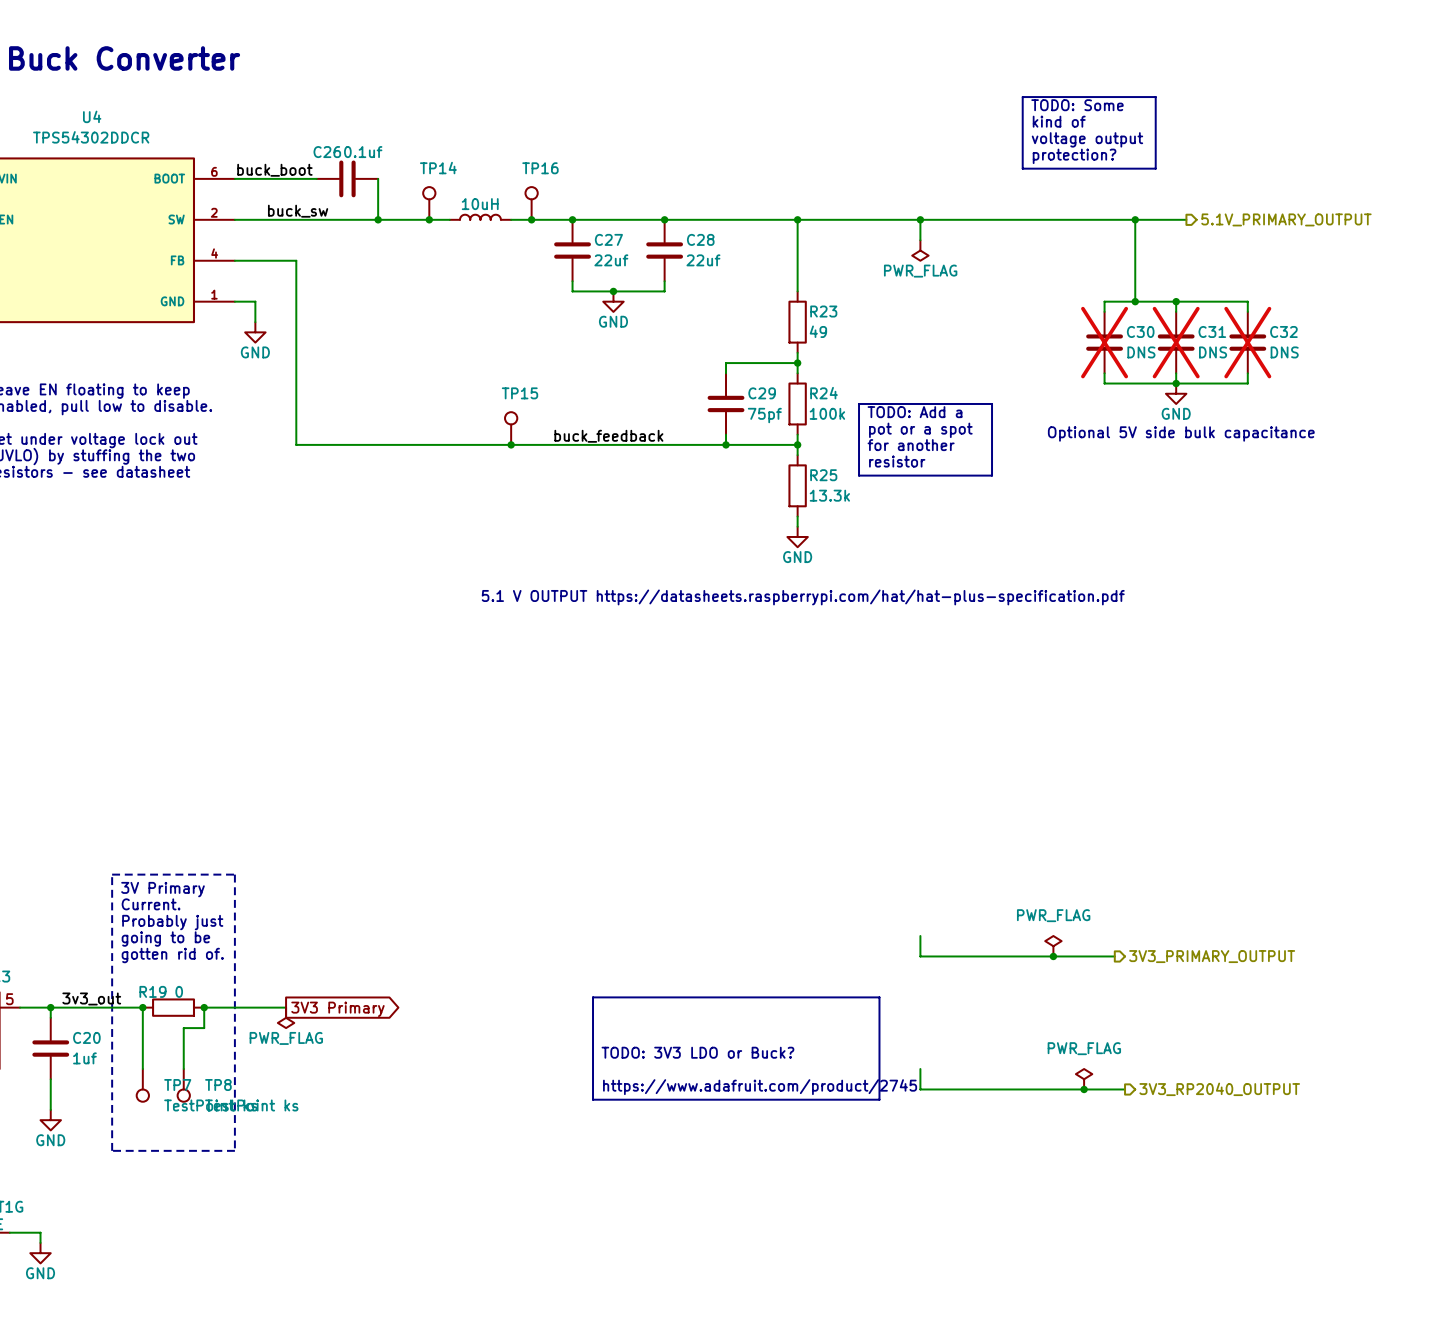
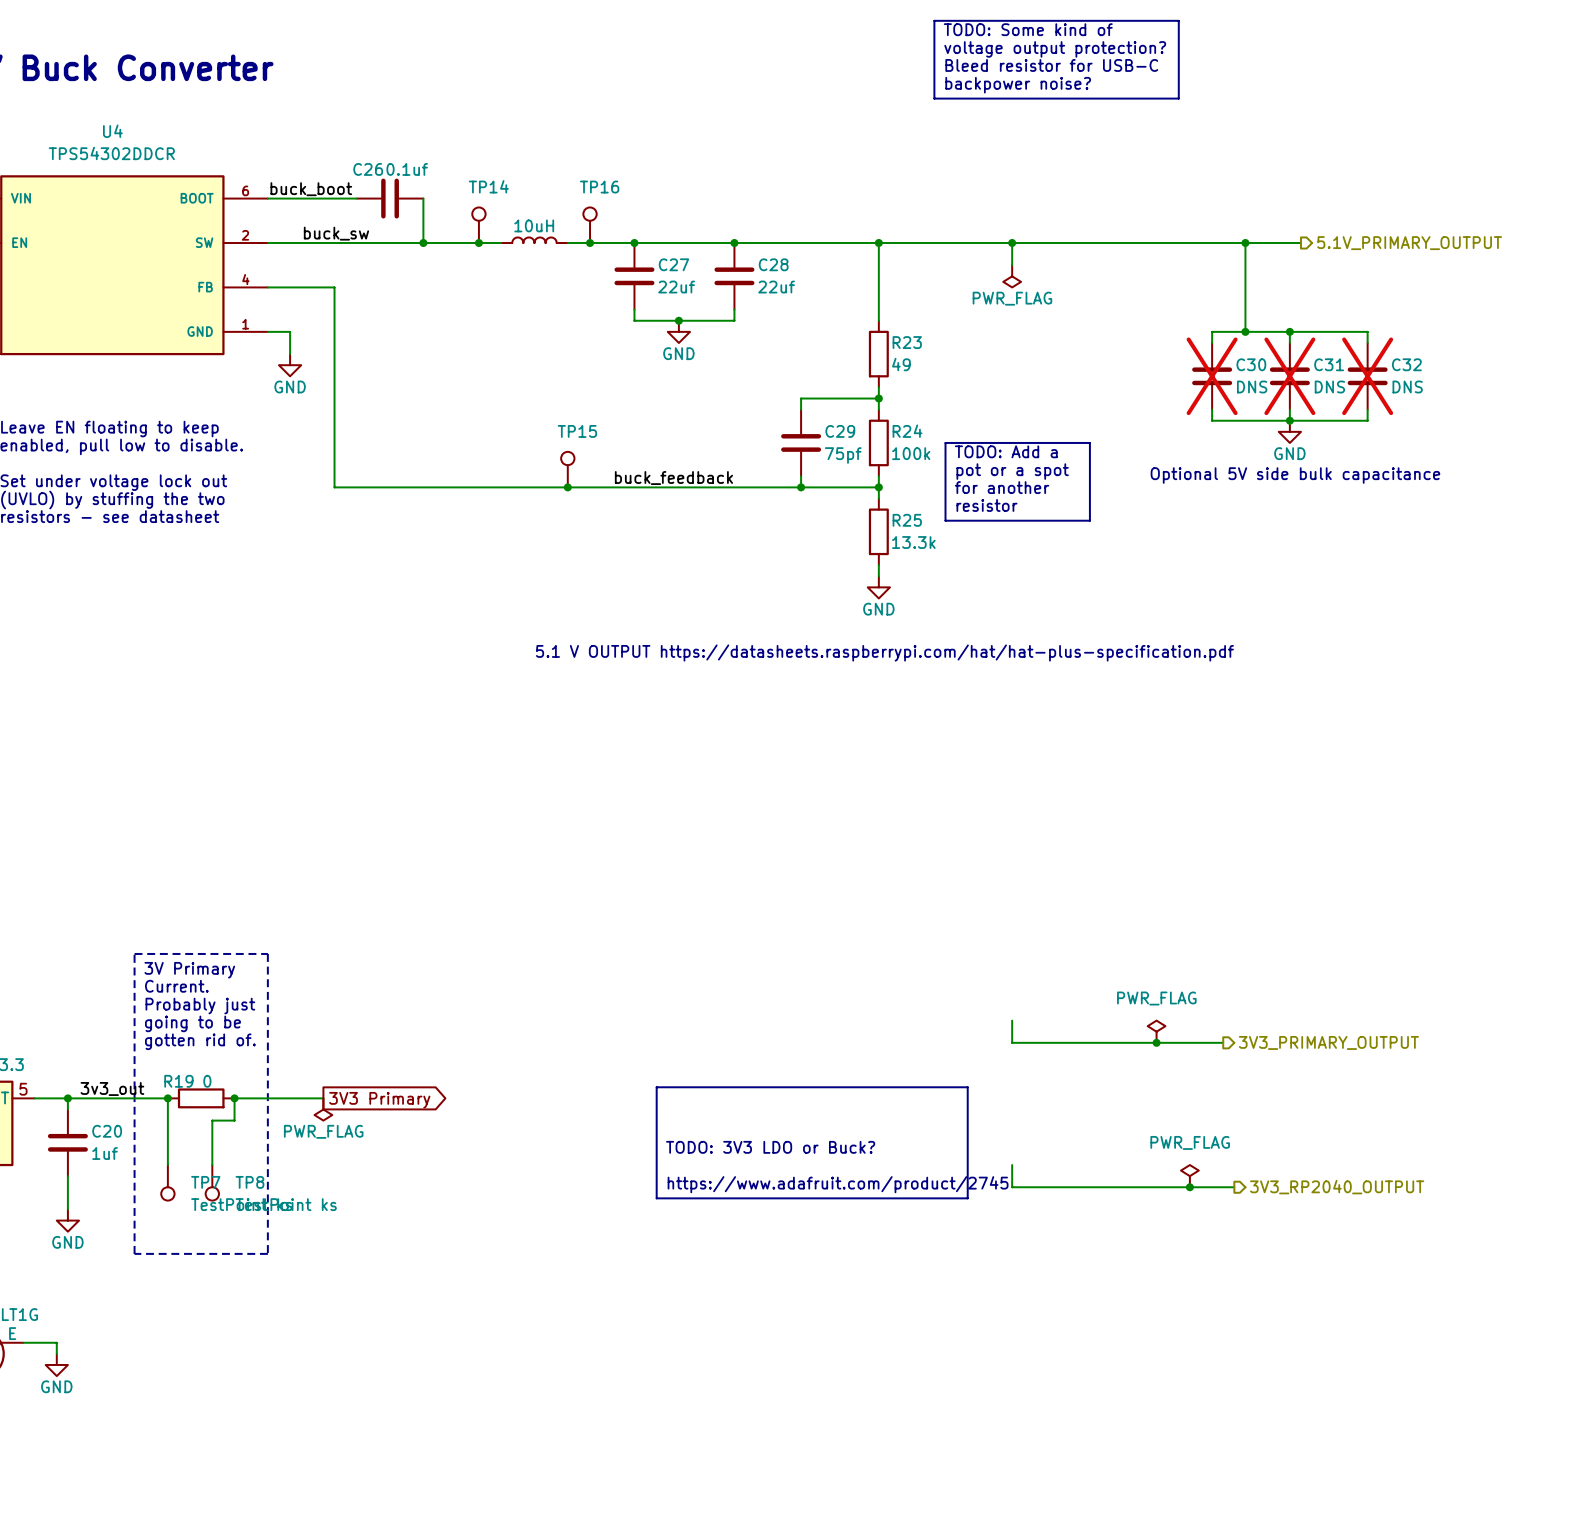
line: none -> (934, 20) (1178, 20) (1178, 98) (934, 98) (934, 20)
text: none -> TODO: Some kind of (1028, 29)
text: none -> voltage output protection? (1055, 49)
text: none -> Bleed resistor for USB-C (1051, 65)
text: none -> backpower noise? (1018, 85)
line: (1022, 97) (1155, 97) (1155, 168) (1022, 168) (1022, 97) -> none
text: TODO: Some (1077, 105) -> none
text: kind of (1059, 121) -> none
text: voltage output (1087, 139) -> none
text: protection? (1074, 156) -> none

